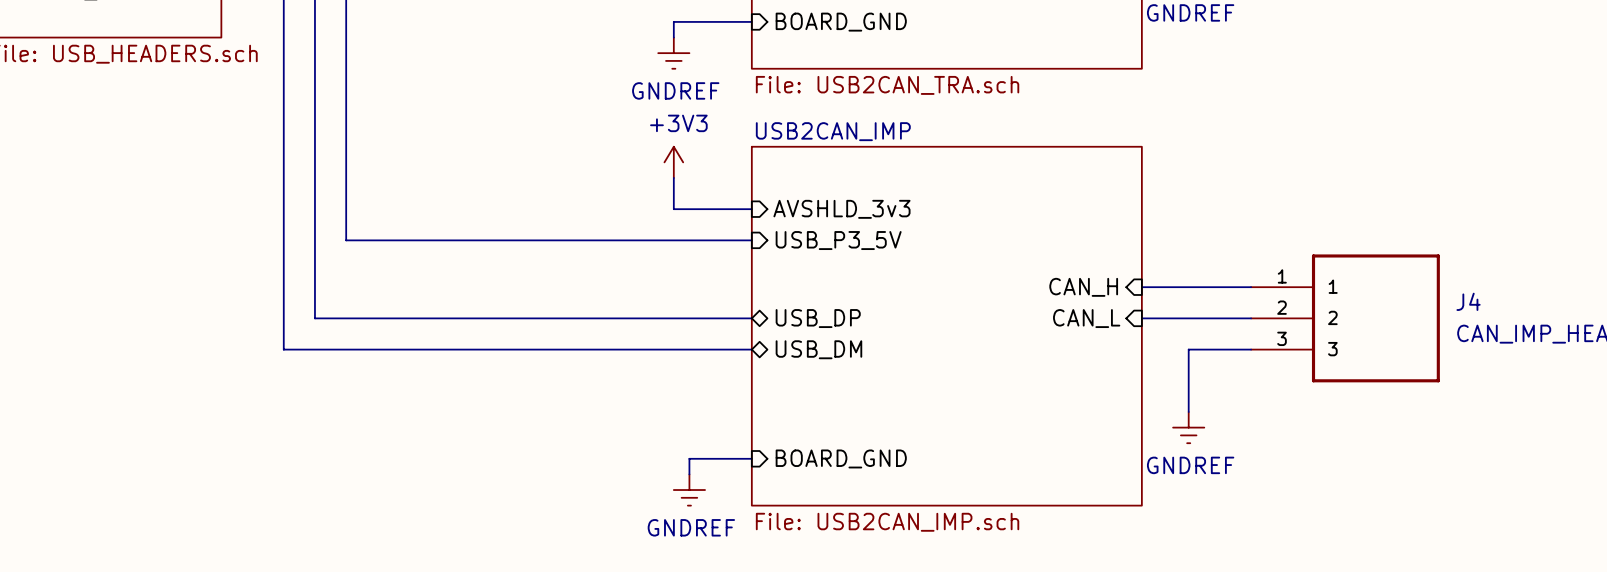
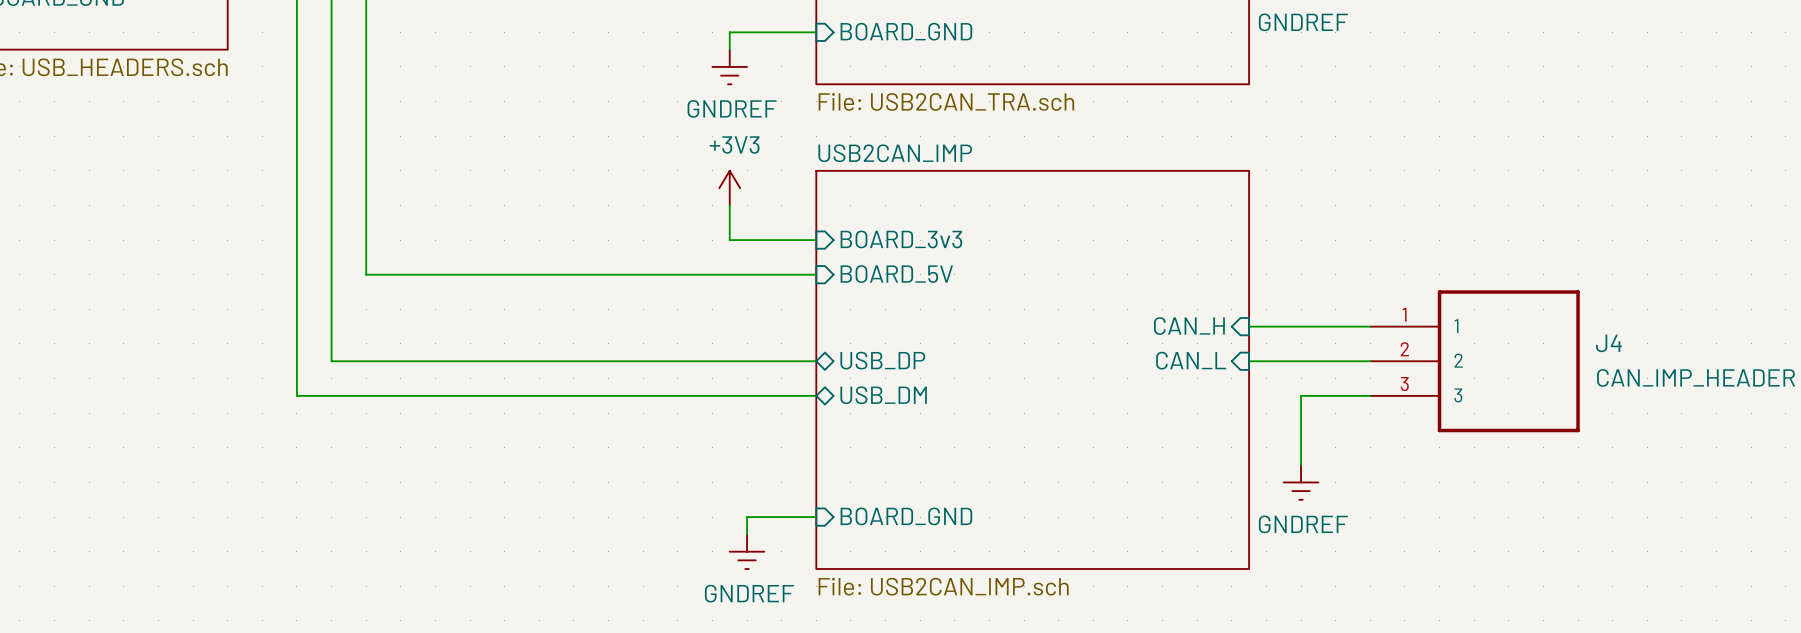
sheet pin: AVSHLD_3v3 (841, 209) -> BOARD_3v3 (901, 239)
sheet pin: USB_P3_5V (838, 240) -> BOARD_5V (896, 274)

